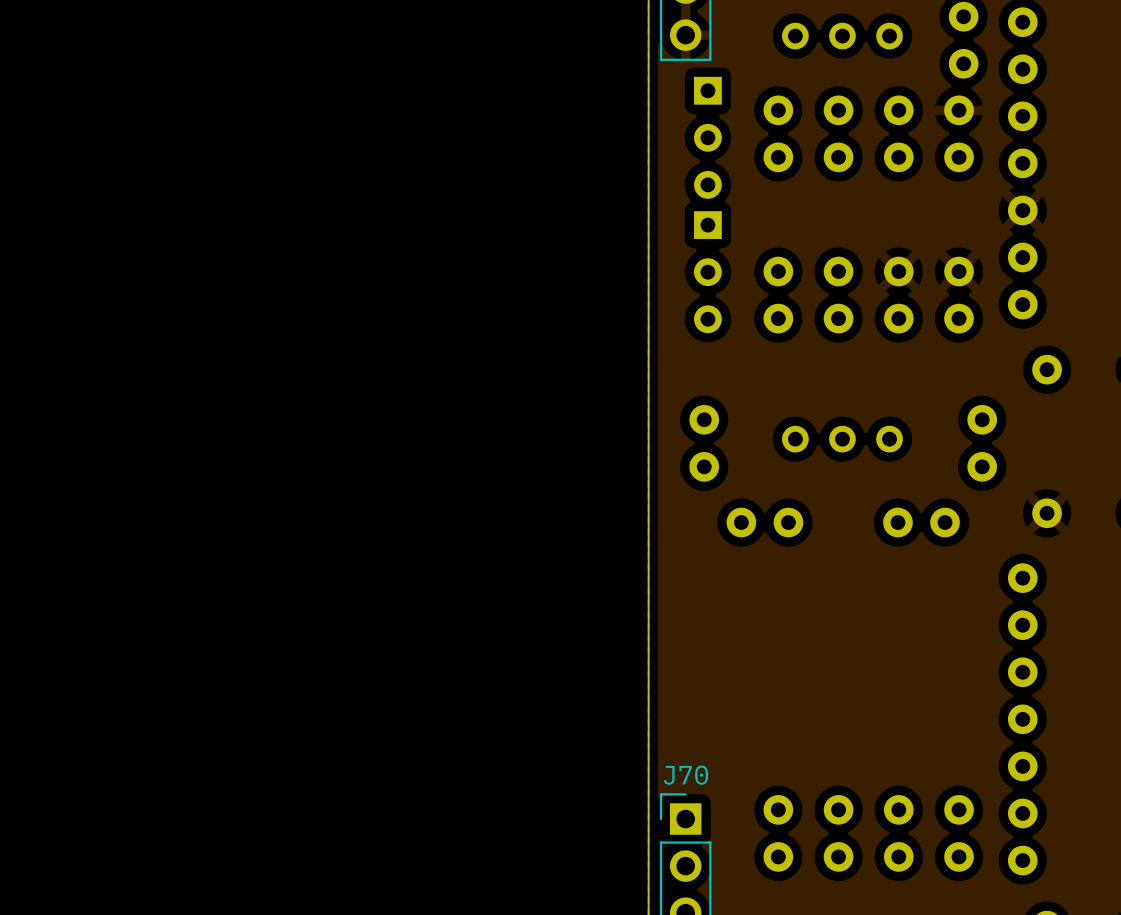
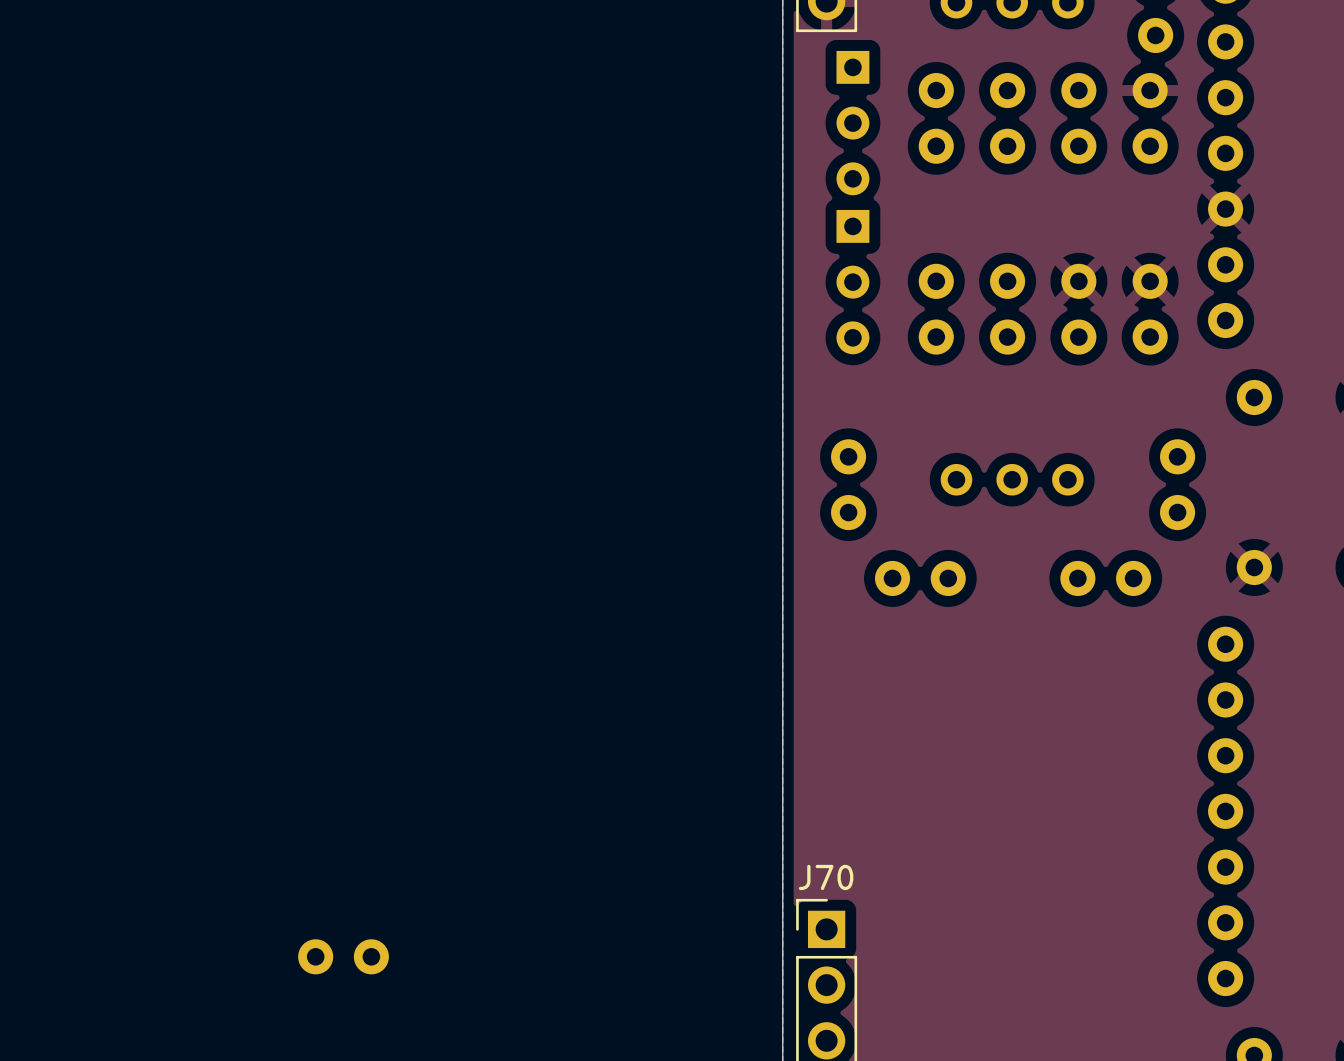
part: (778, 833) -> none
part: (838, 833) -> none
part: (898, 833) -> none
part: (959, 833) -> none
part: none -> (343, 956)

